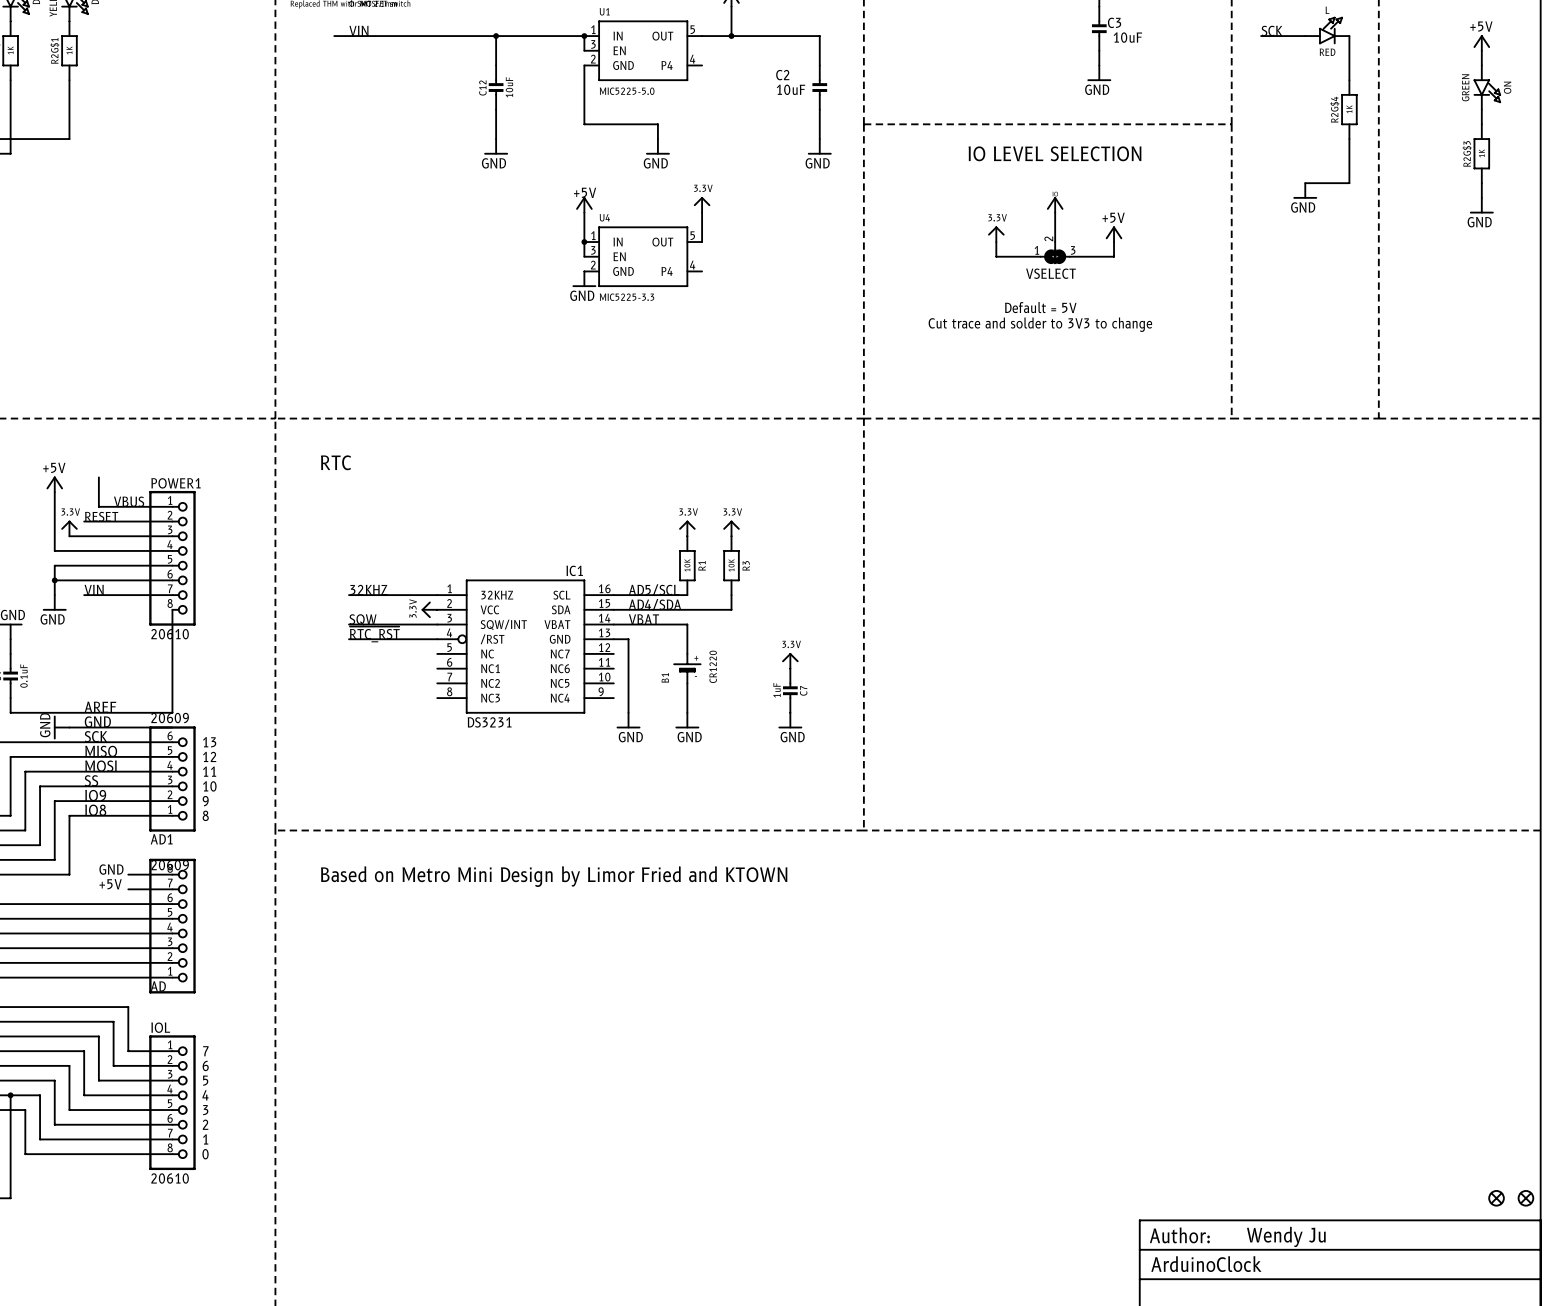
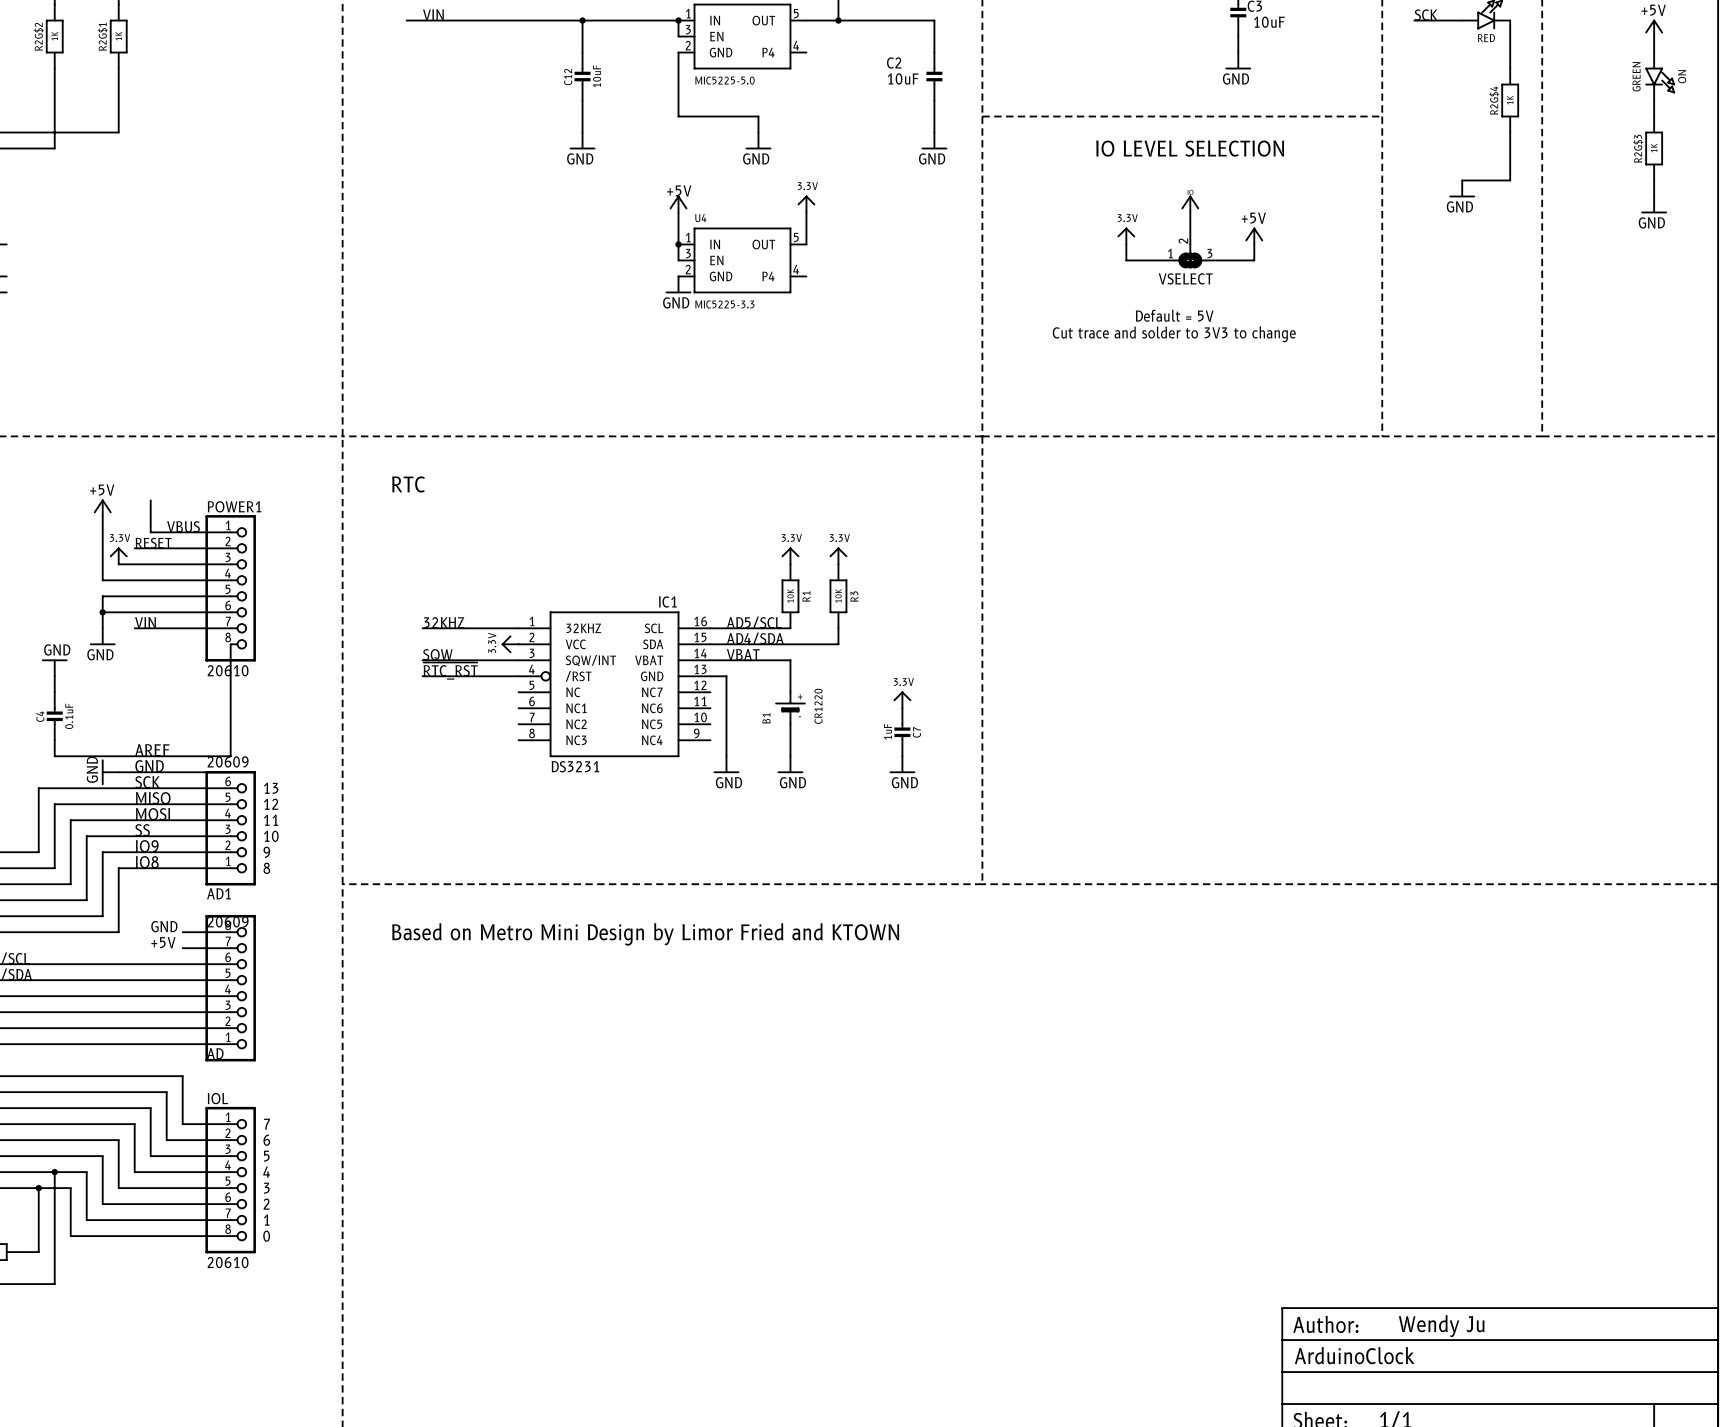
part: (1496, 1198) -> none
part: (1525, 1198) -> none

